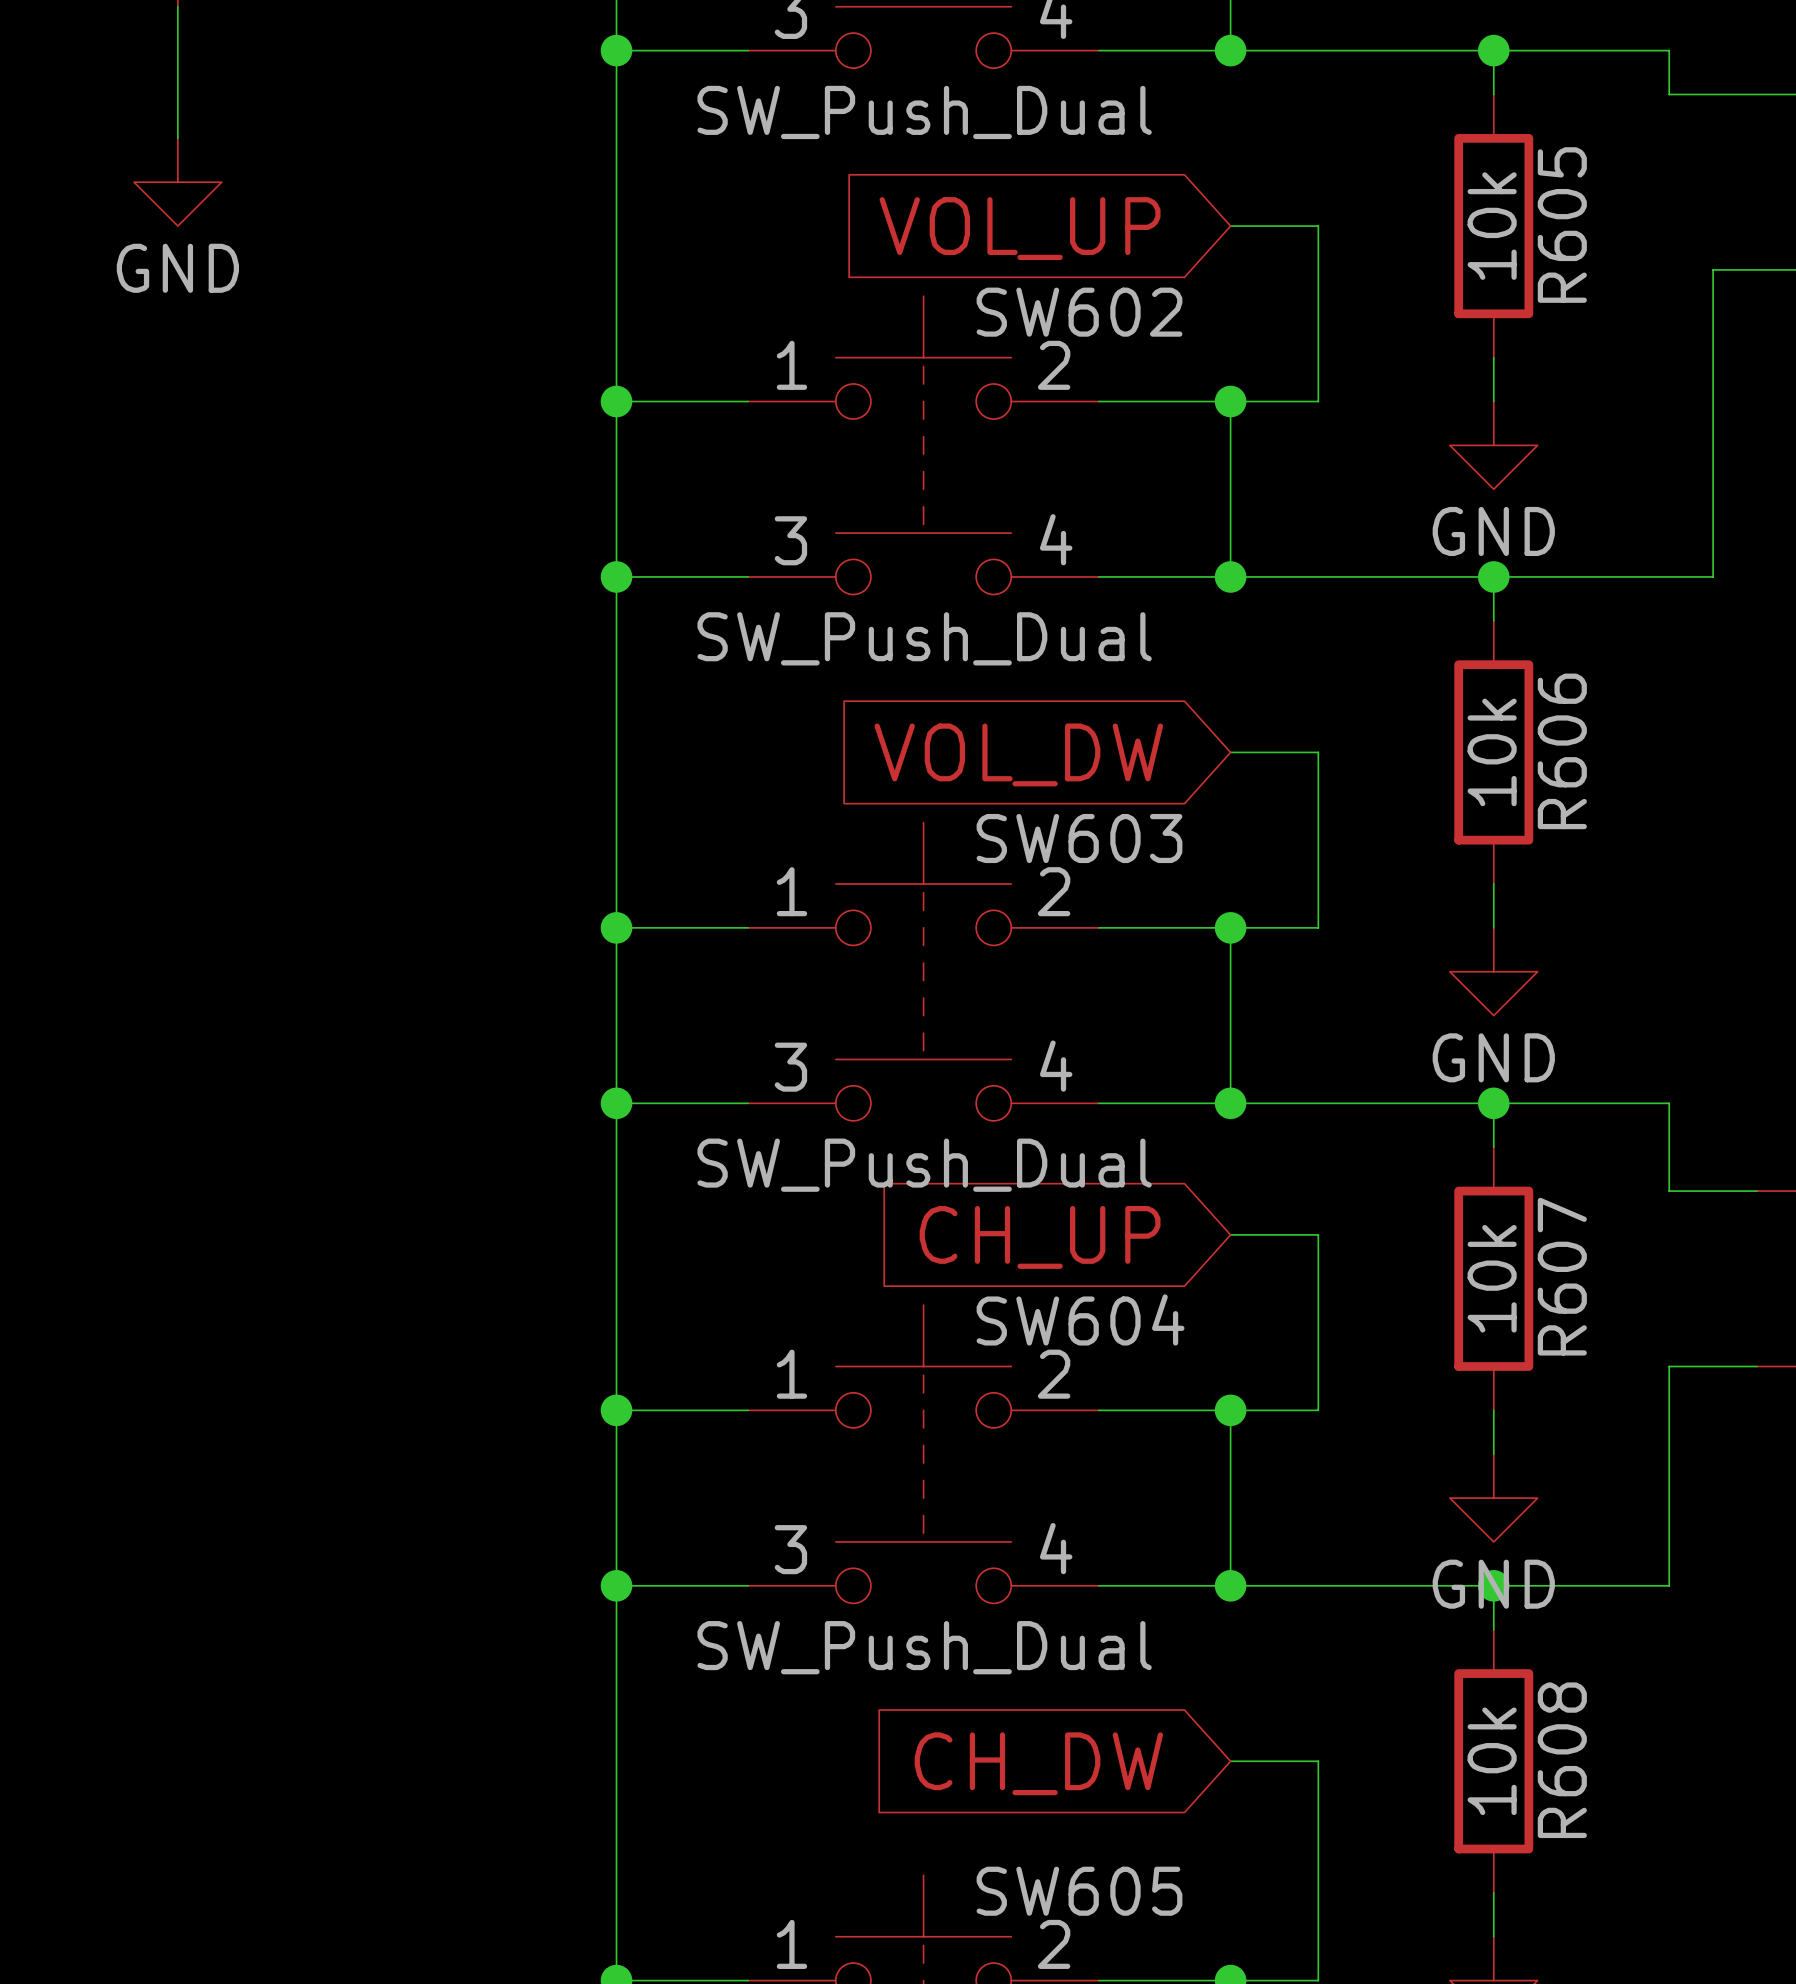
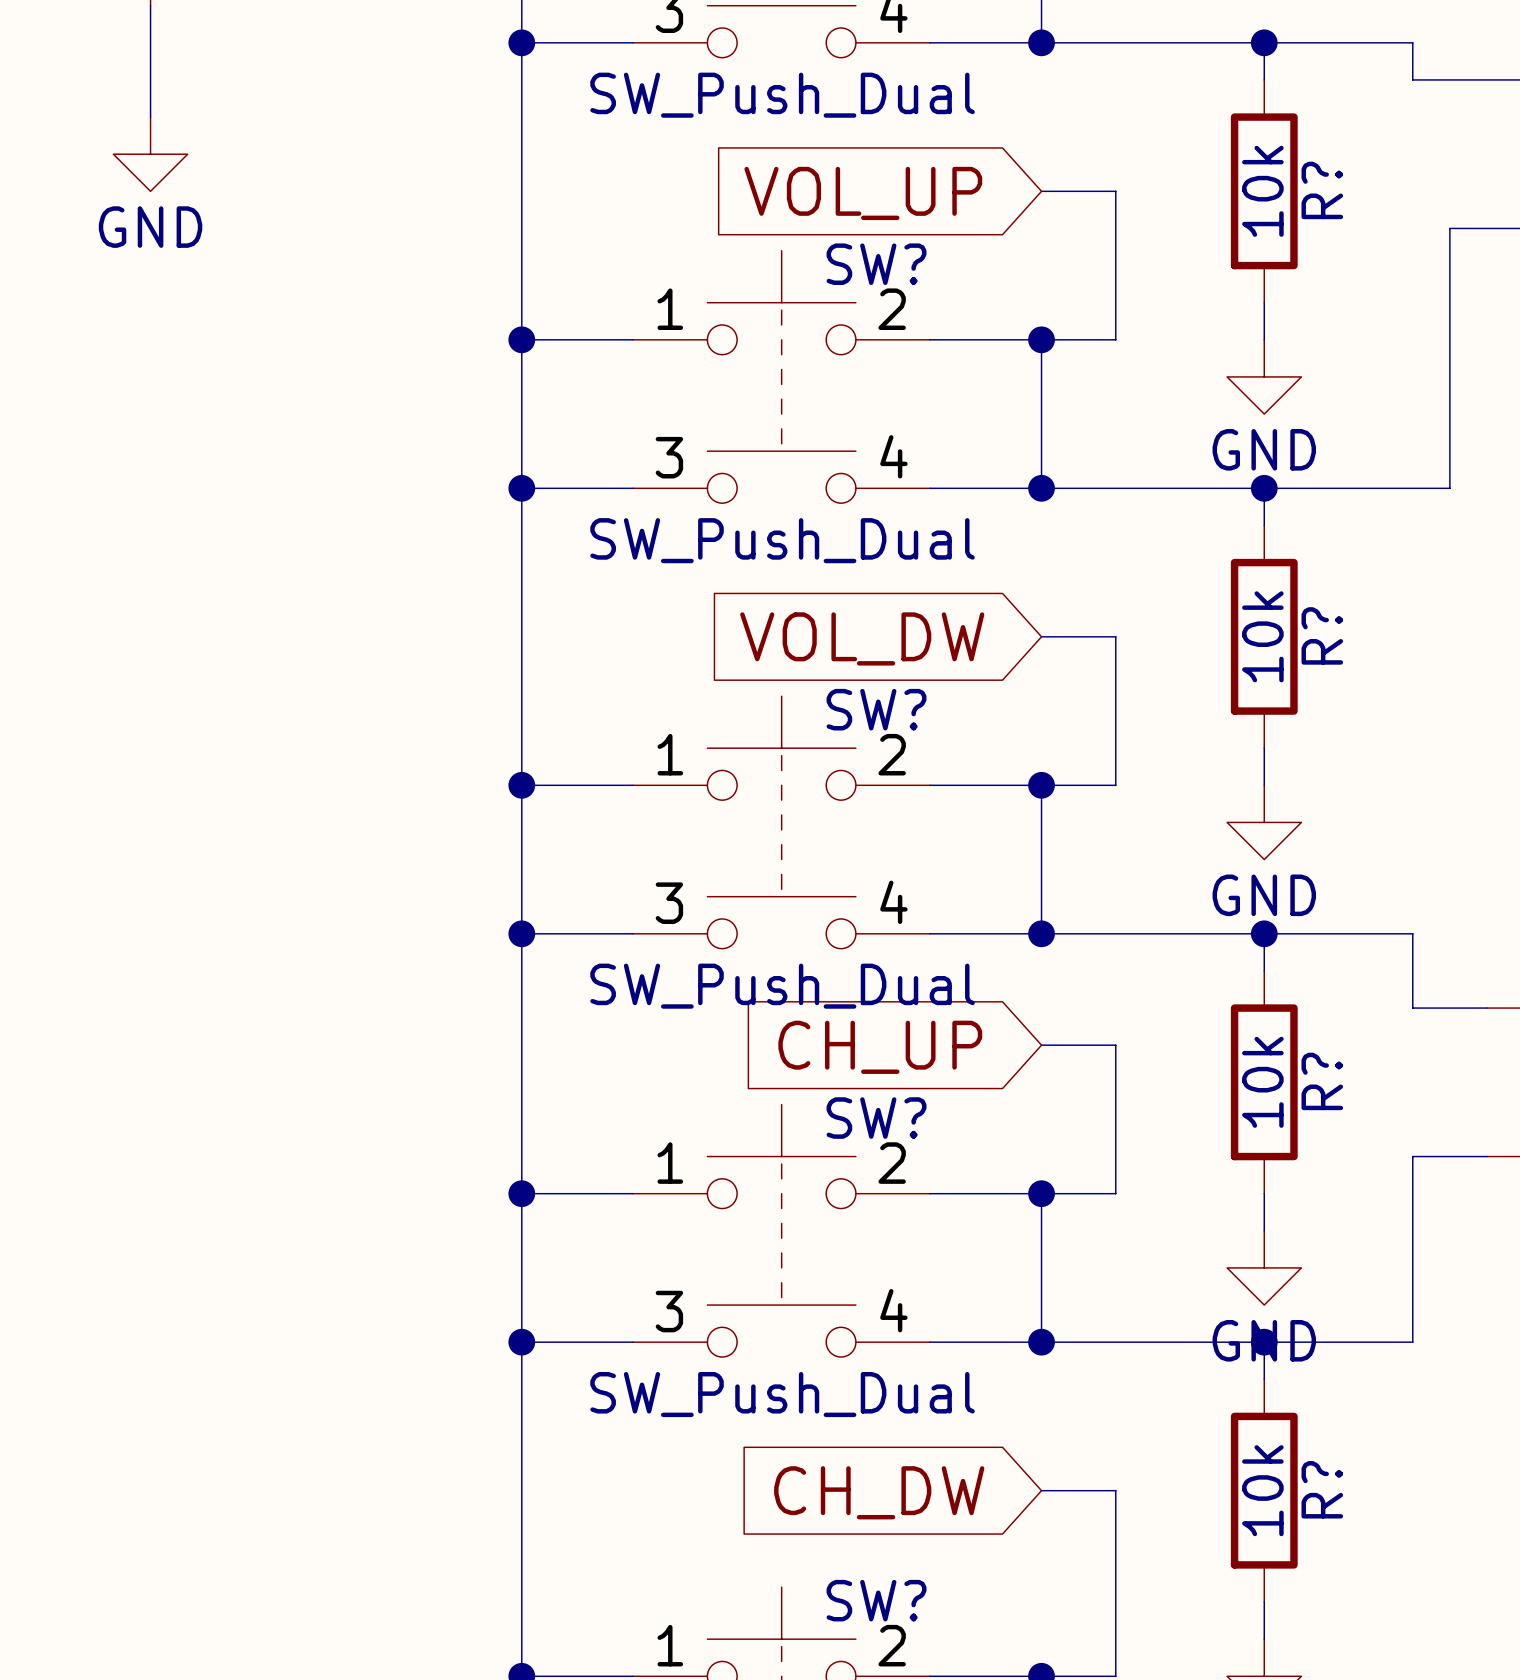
R605 name: R605 (1562, 225) -> R? (1322, 190)
SW602 name: SW602 (1079, 312) -> SW? (876, 264)
R606 name: R606 (1562, 751) -> R? (1322, 635)
SW603 name: SW603 (1079, 838) -> SW? (876, 709)
R607 name: R607 (1562, 1276) -> R? (1322, 1081)
SW604 name: SW604 (1080, 1319) -> SW? (876, 1118)
R608 name: R608 (1562, 1760) -> R? (1322, 1489)
SW605 name: SW605 (1079, 1891) -> SW? (876, 1600)

